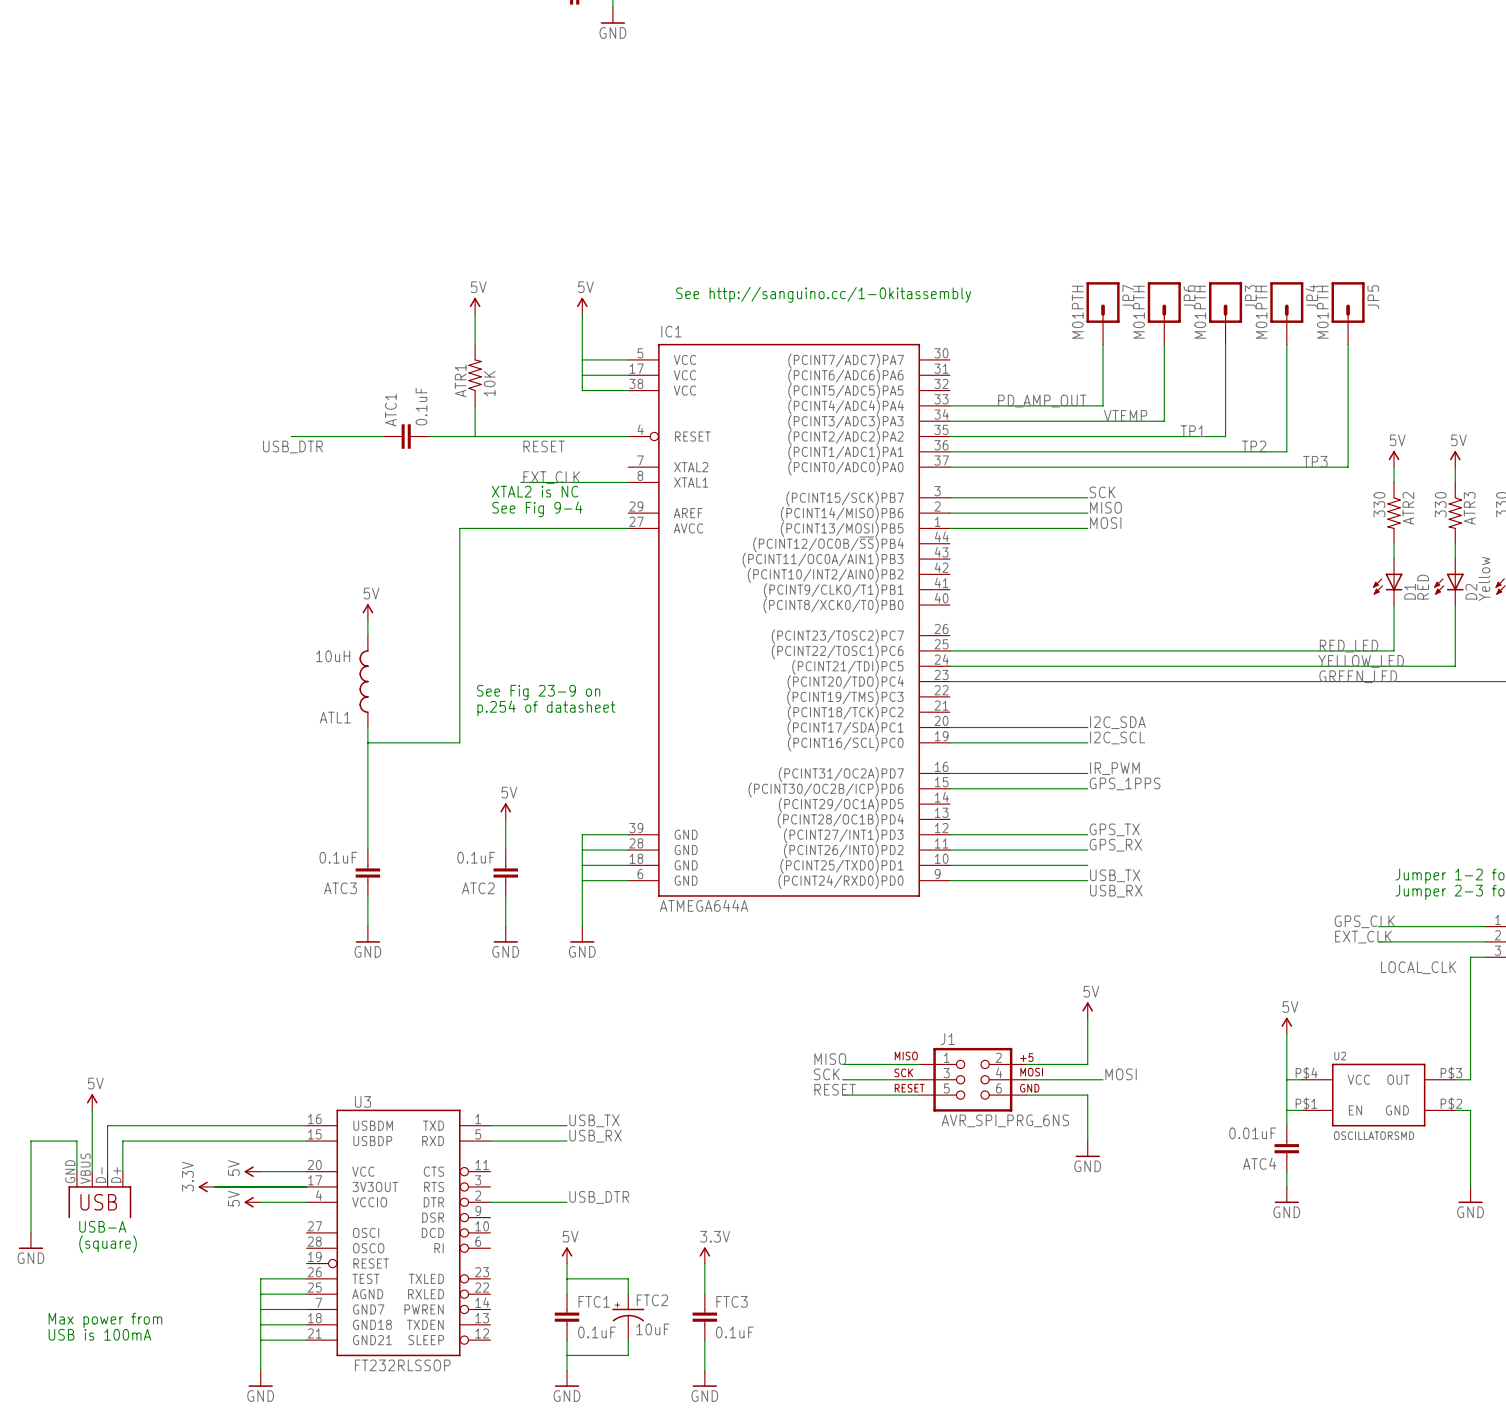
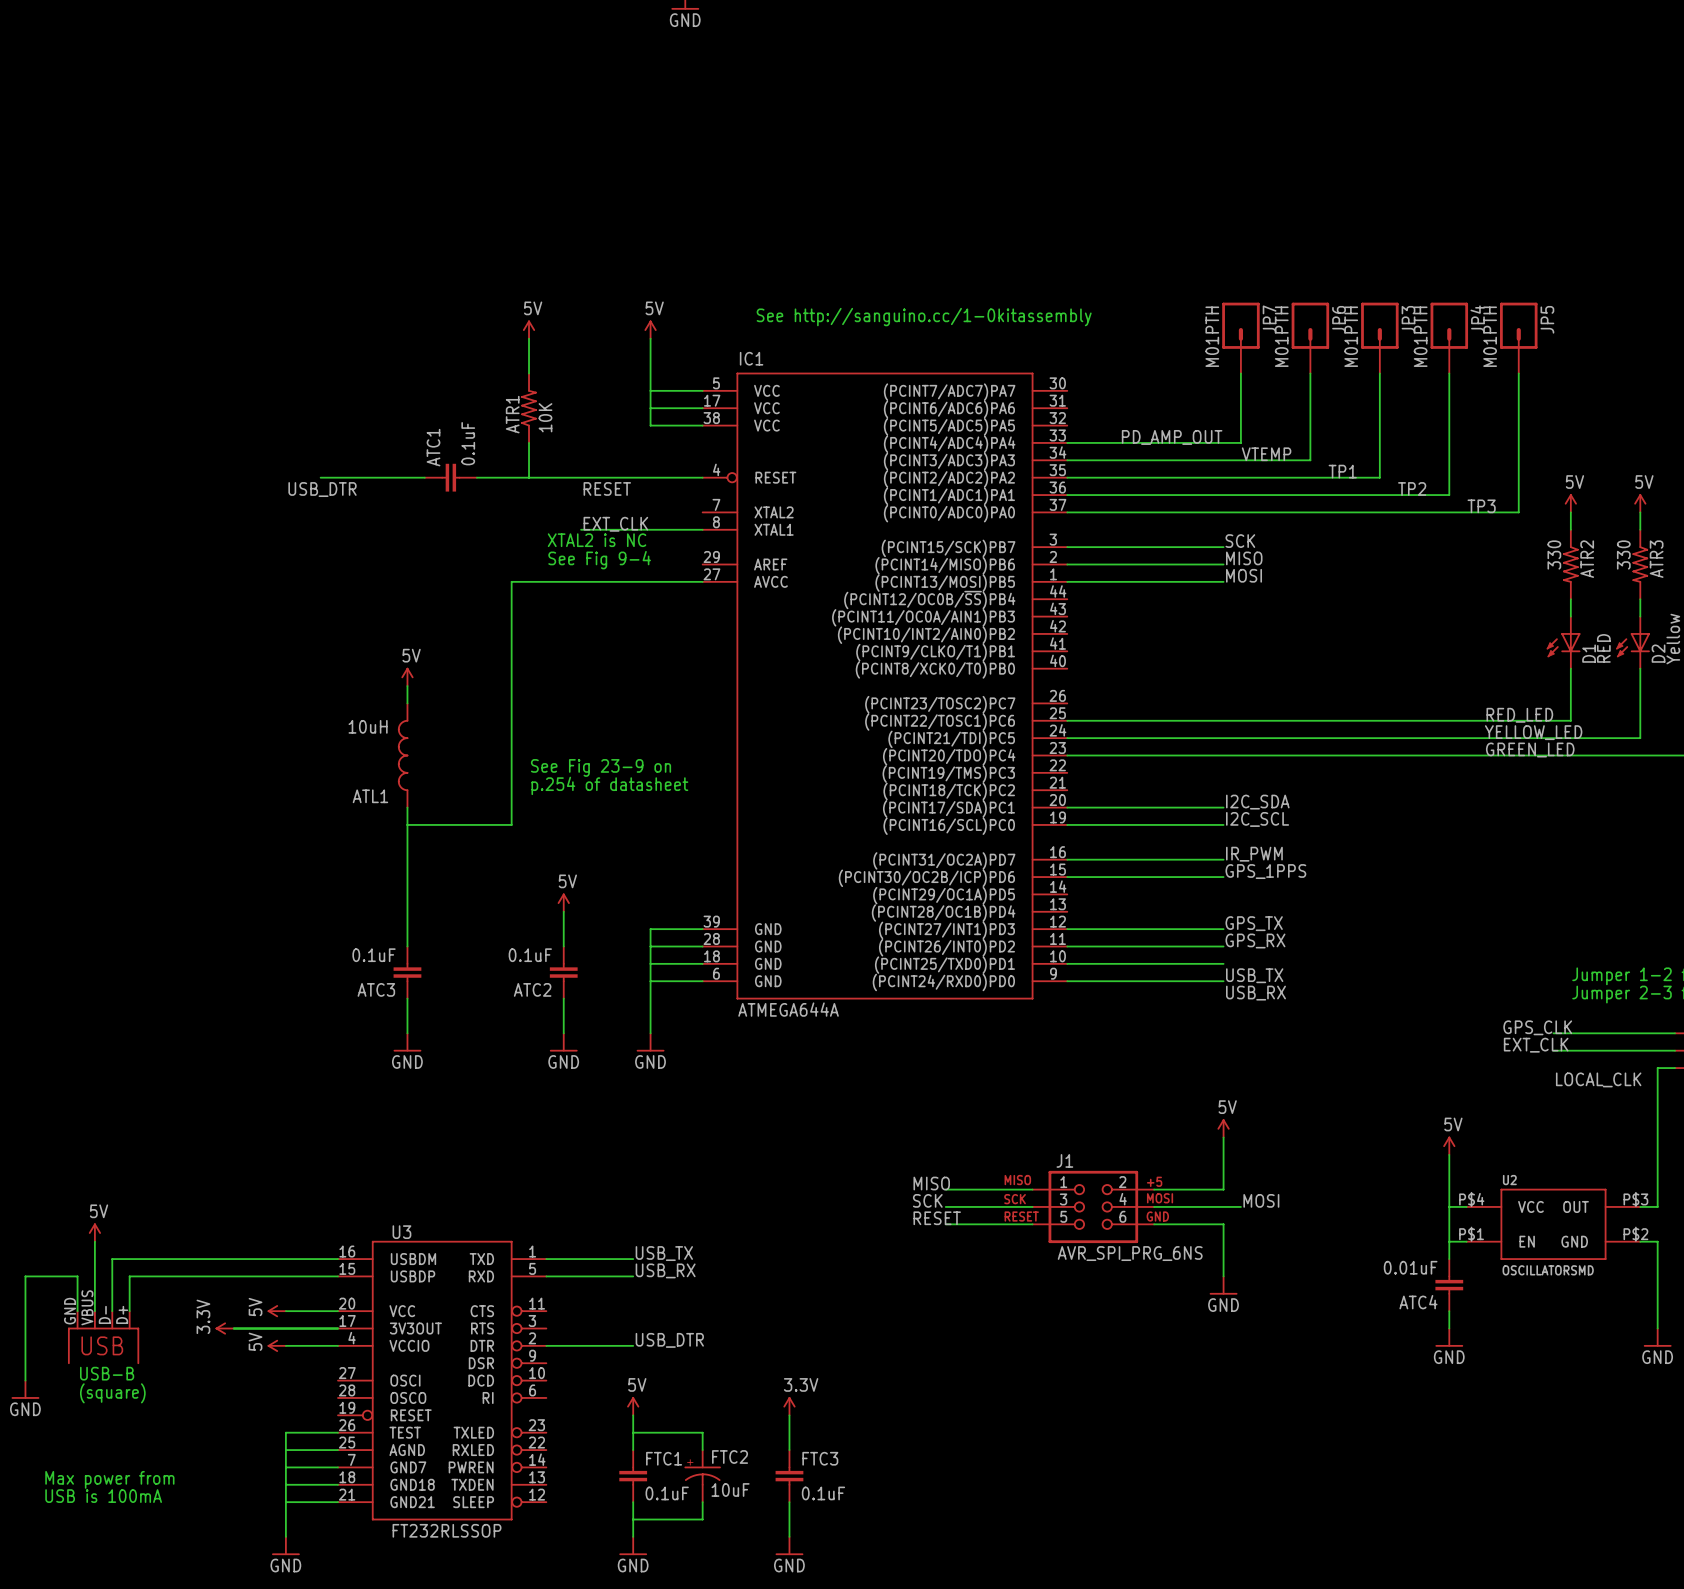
text: USB-A (102, 1226) -> USB-B (107, 1373)

